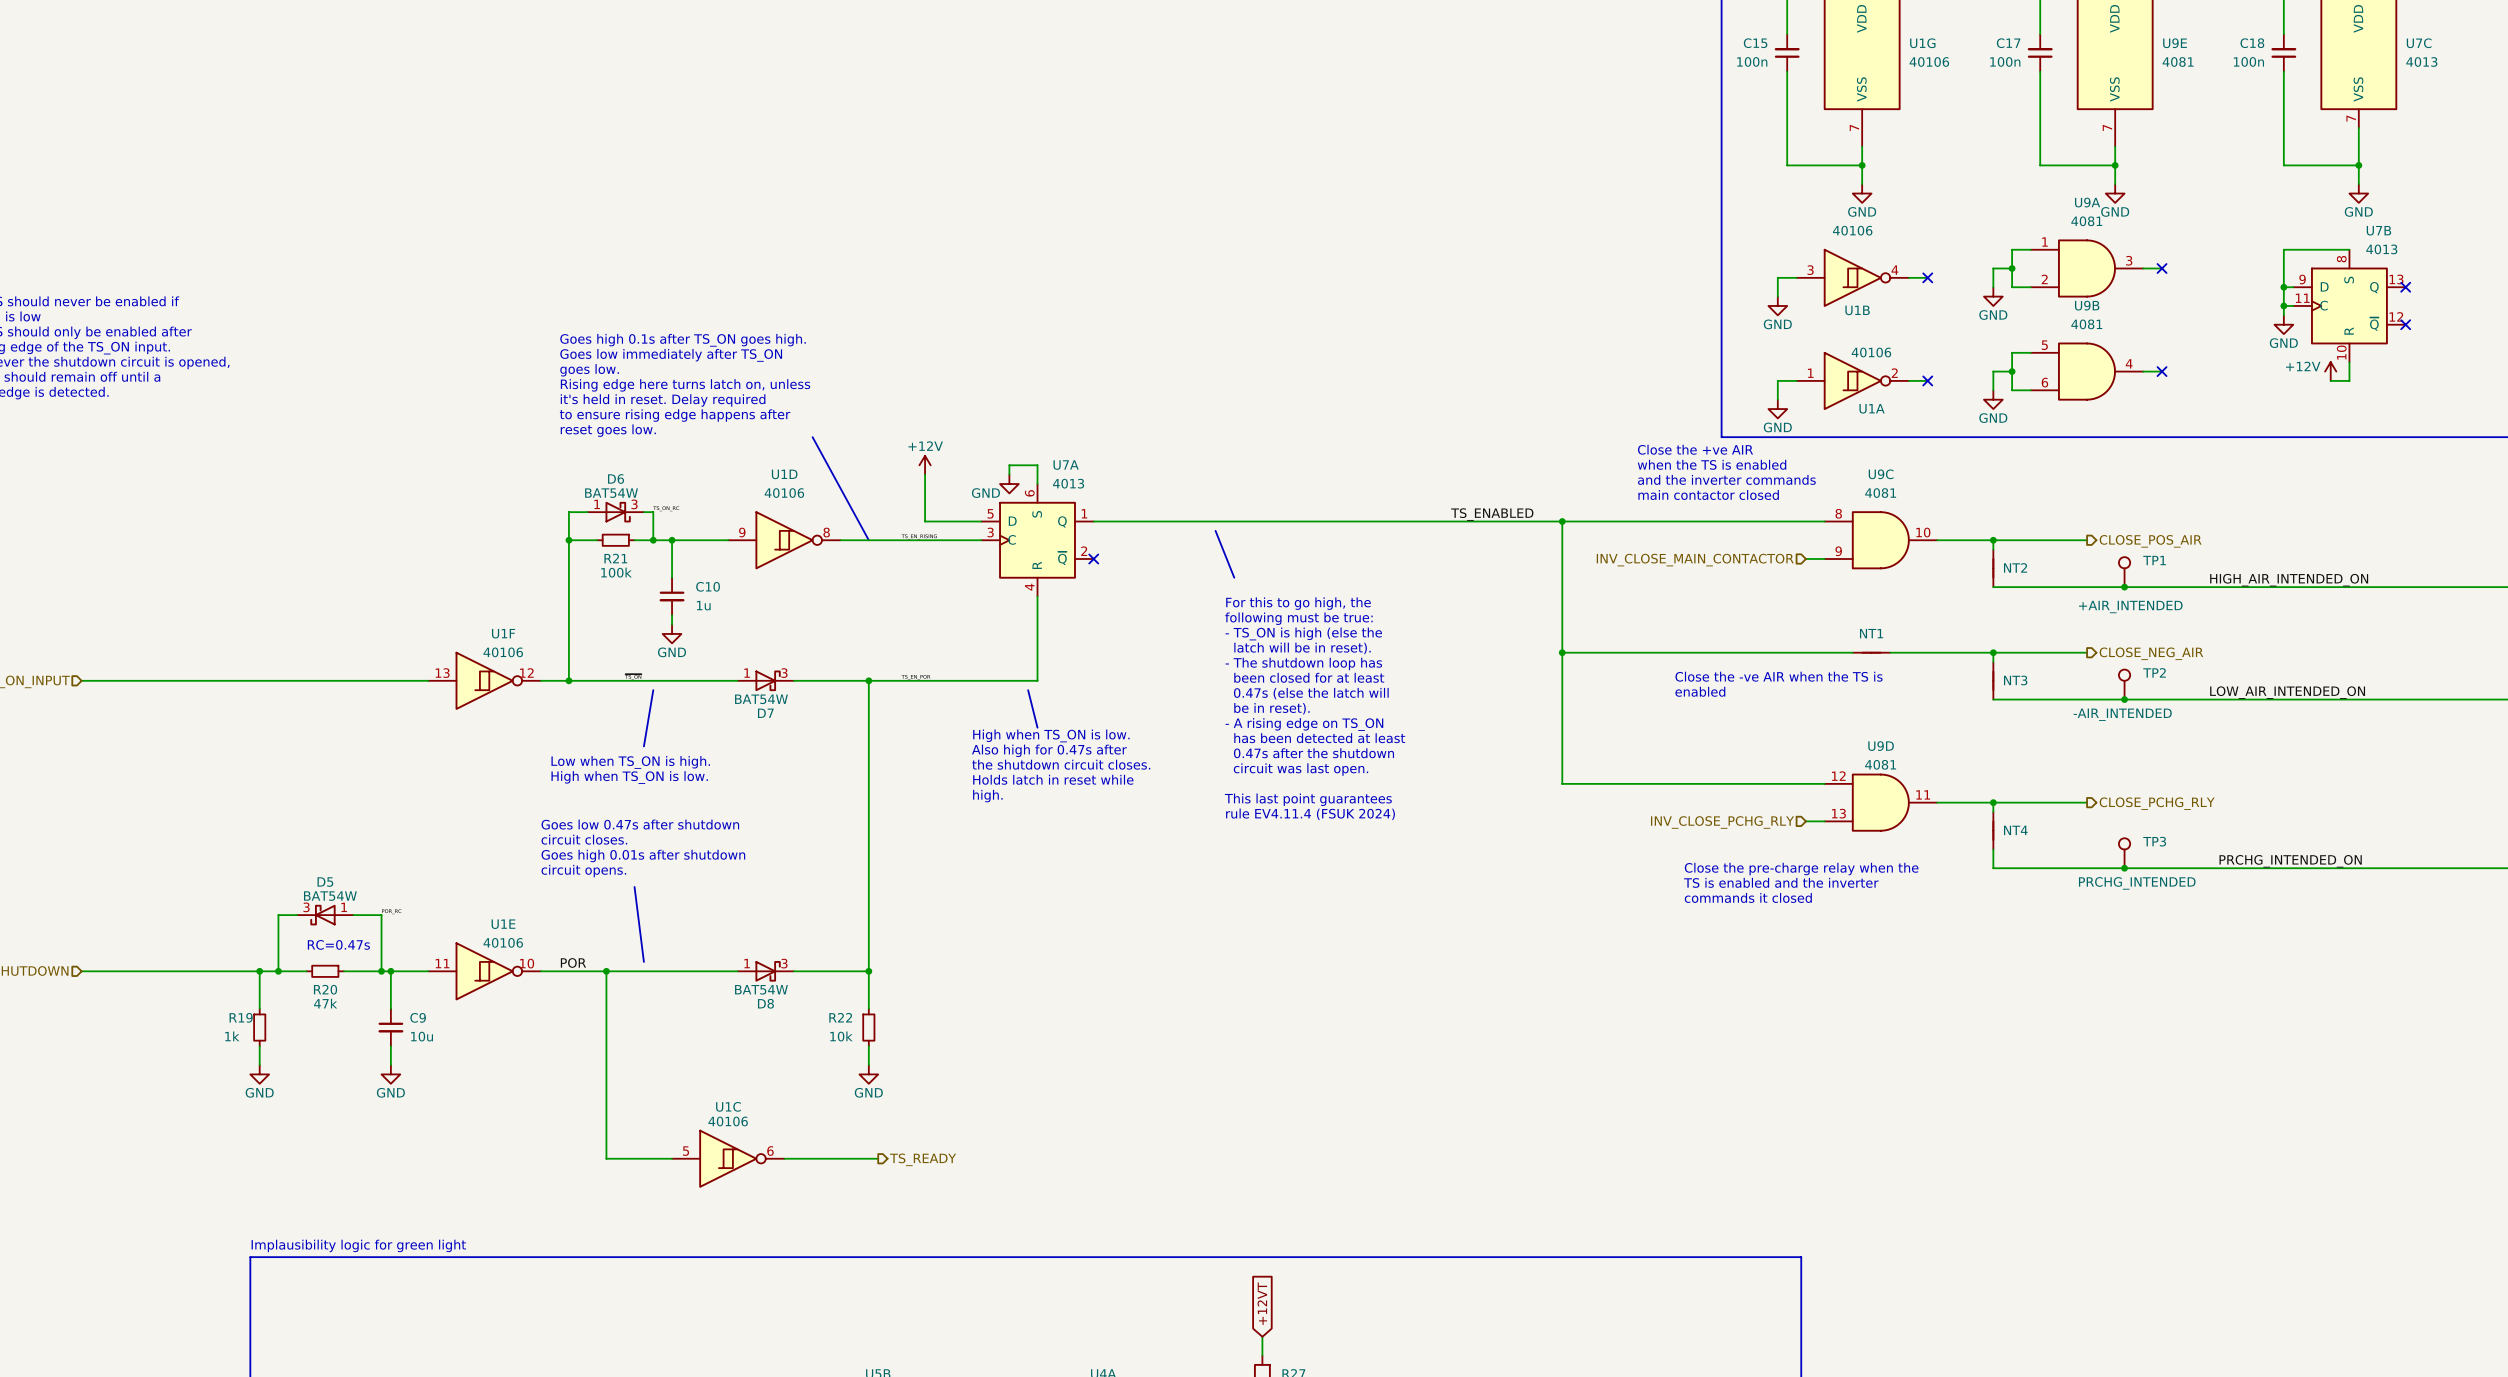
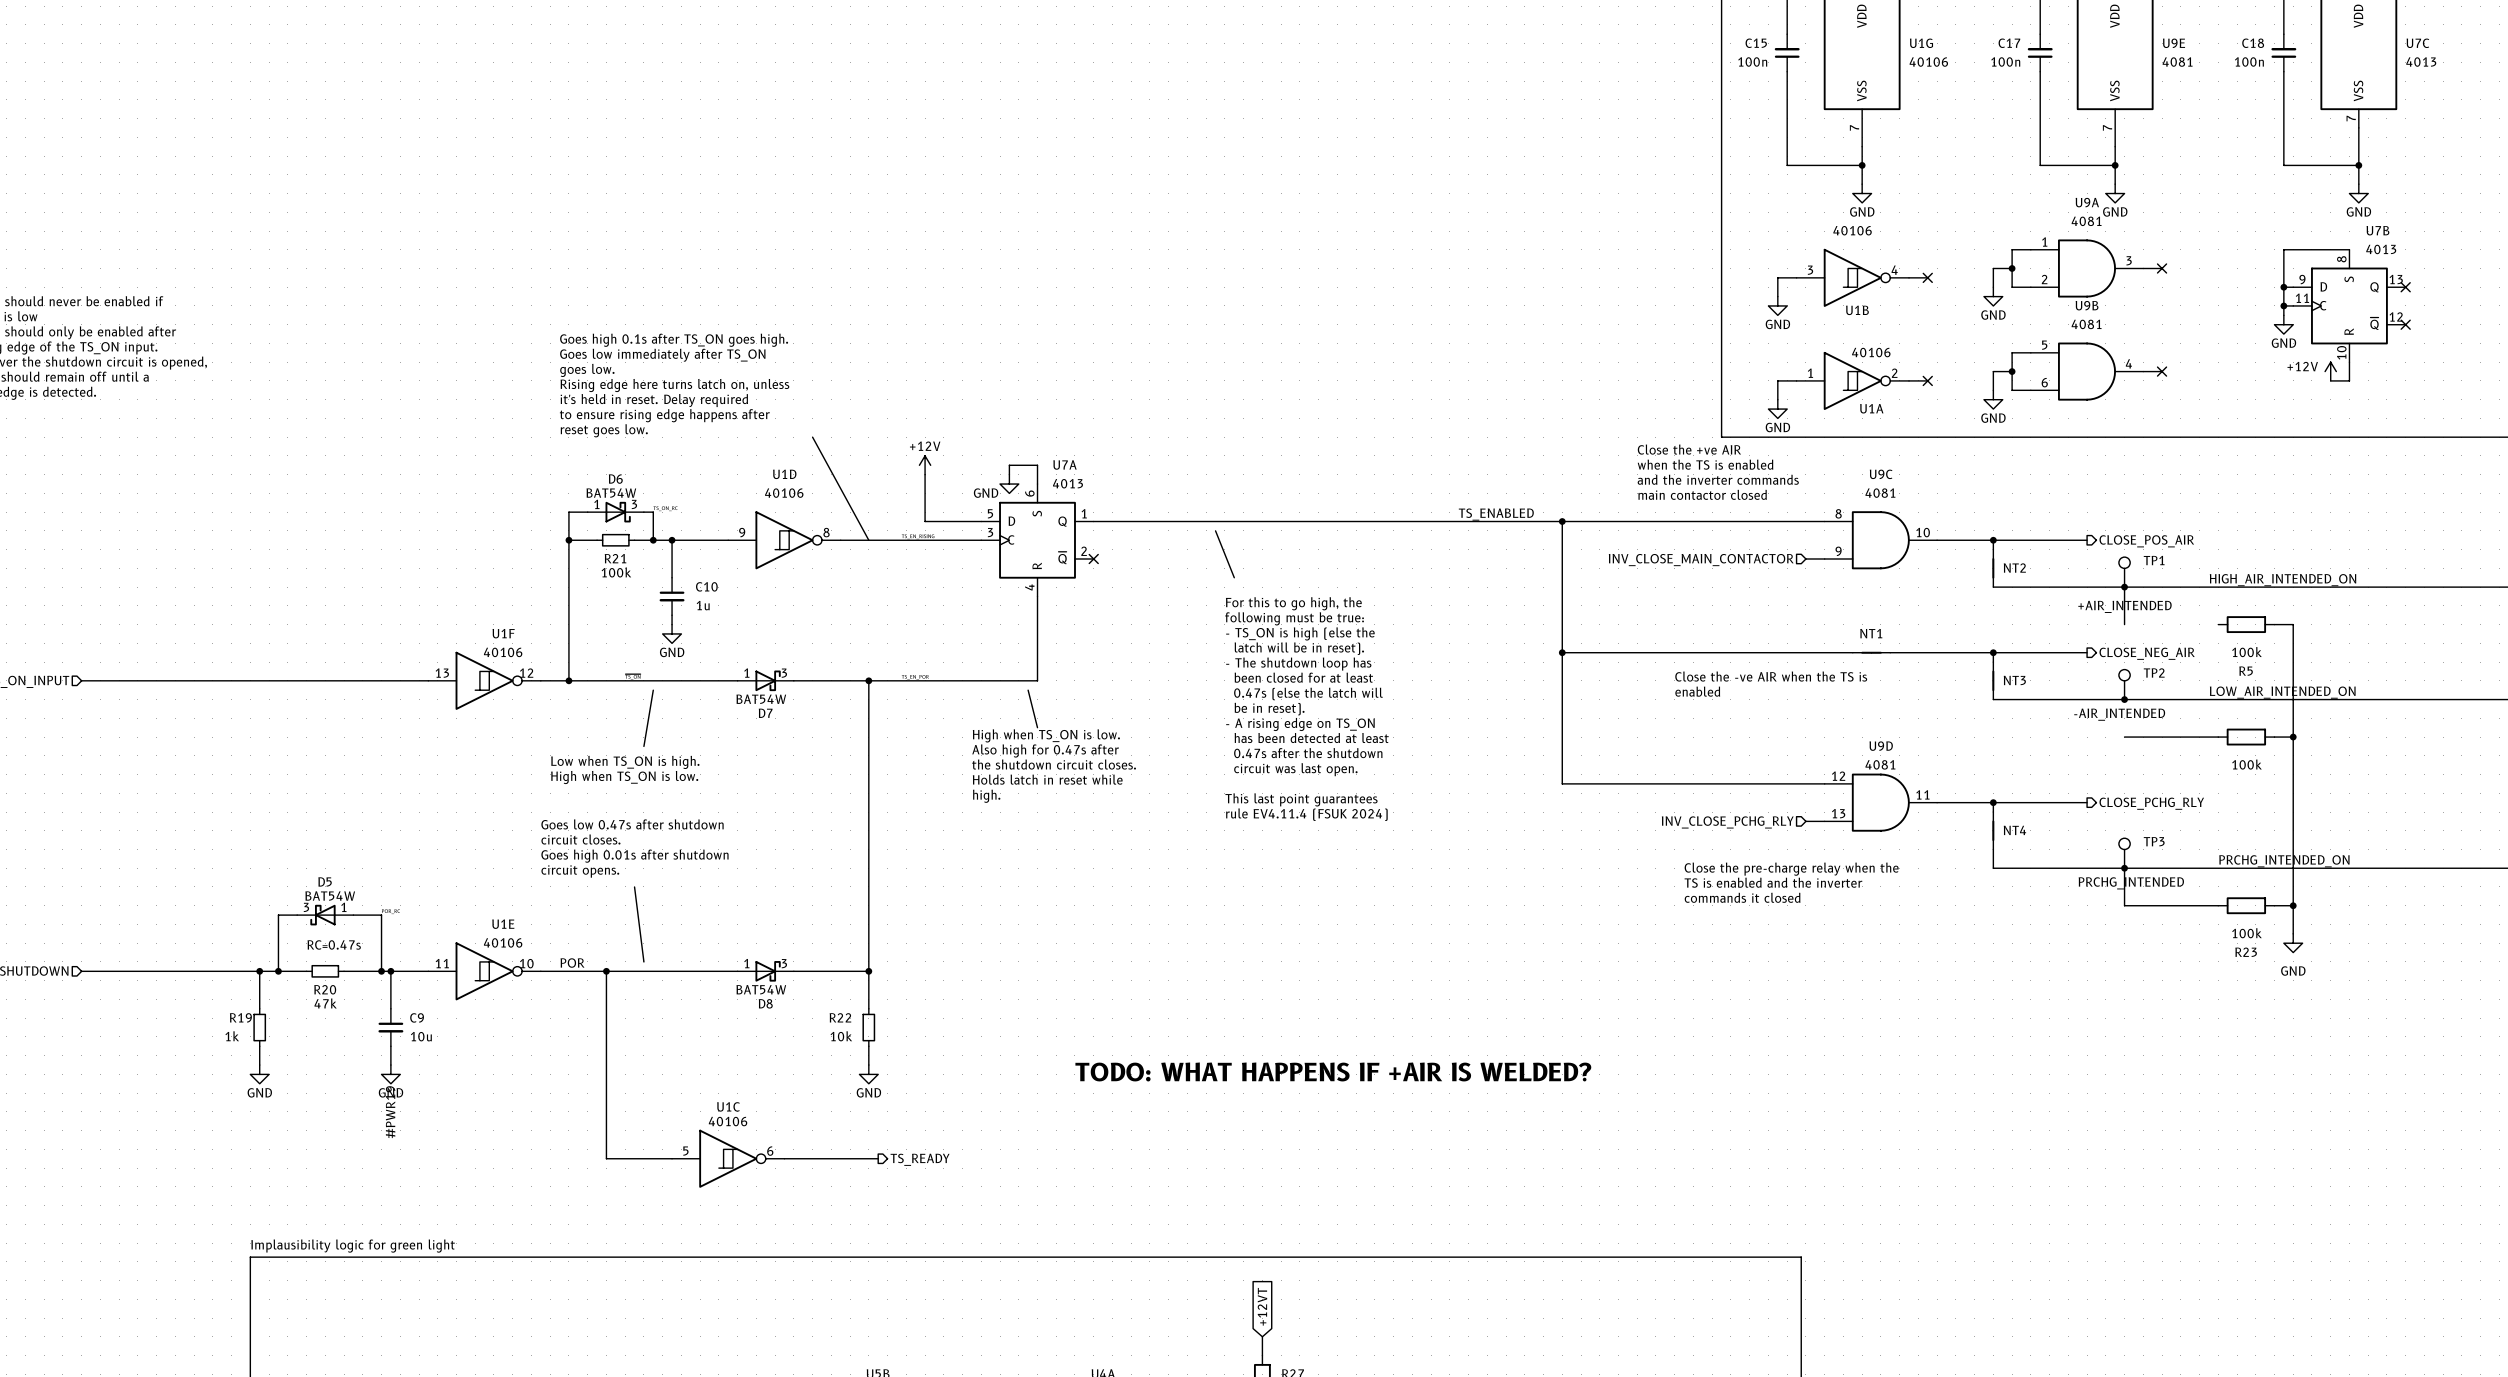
wire: none -> (2124, 587) (2124, 624)
R5: none -> 100k (2246, 624)
wire: none -> (2274, 624) (2293, 624) (2293, 933)
wire: none -> (2124, 737) (2218, 737)
#PWR19: none -> 100k (2246, 737)
wire: none -> (2274, 737) (2293, 737)
junction: none -> (2293, 737)
wire: none -> (2124, 868) (2124, 905) (2218, 905)
R23: none -> 100k (2246, 905)
wire: none -> (2274, 905) (2293, 905)
junction: none -> (2293, 905)
power symbol: none -> GND (2293, 943)
text: none -> TODO: WHAT HAPPENS IF +AIR IS WELDED? (1333, 1071)

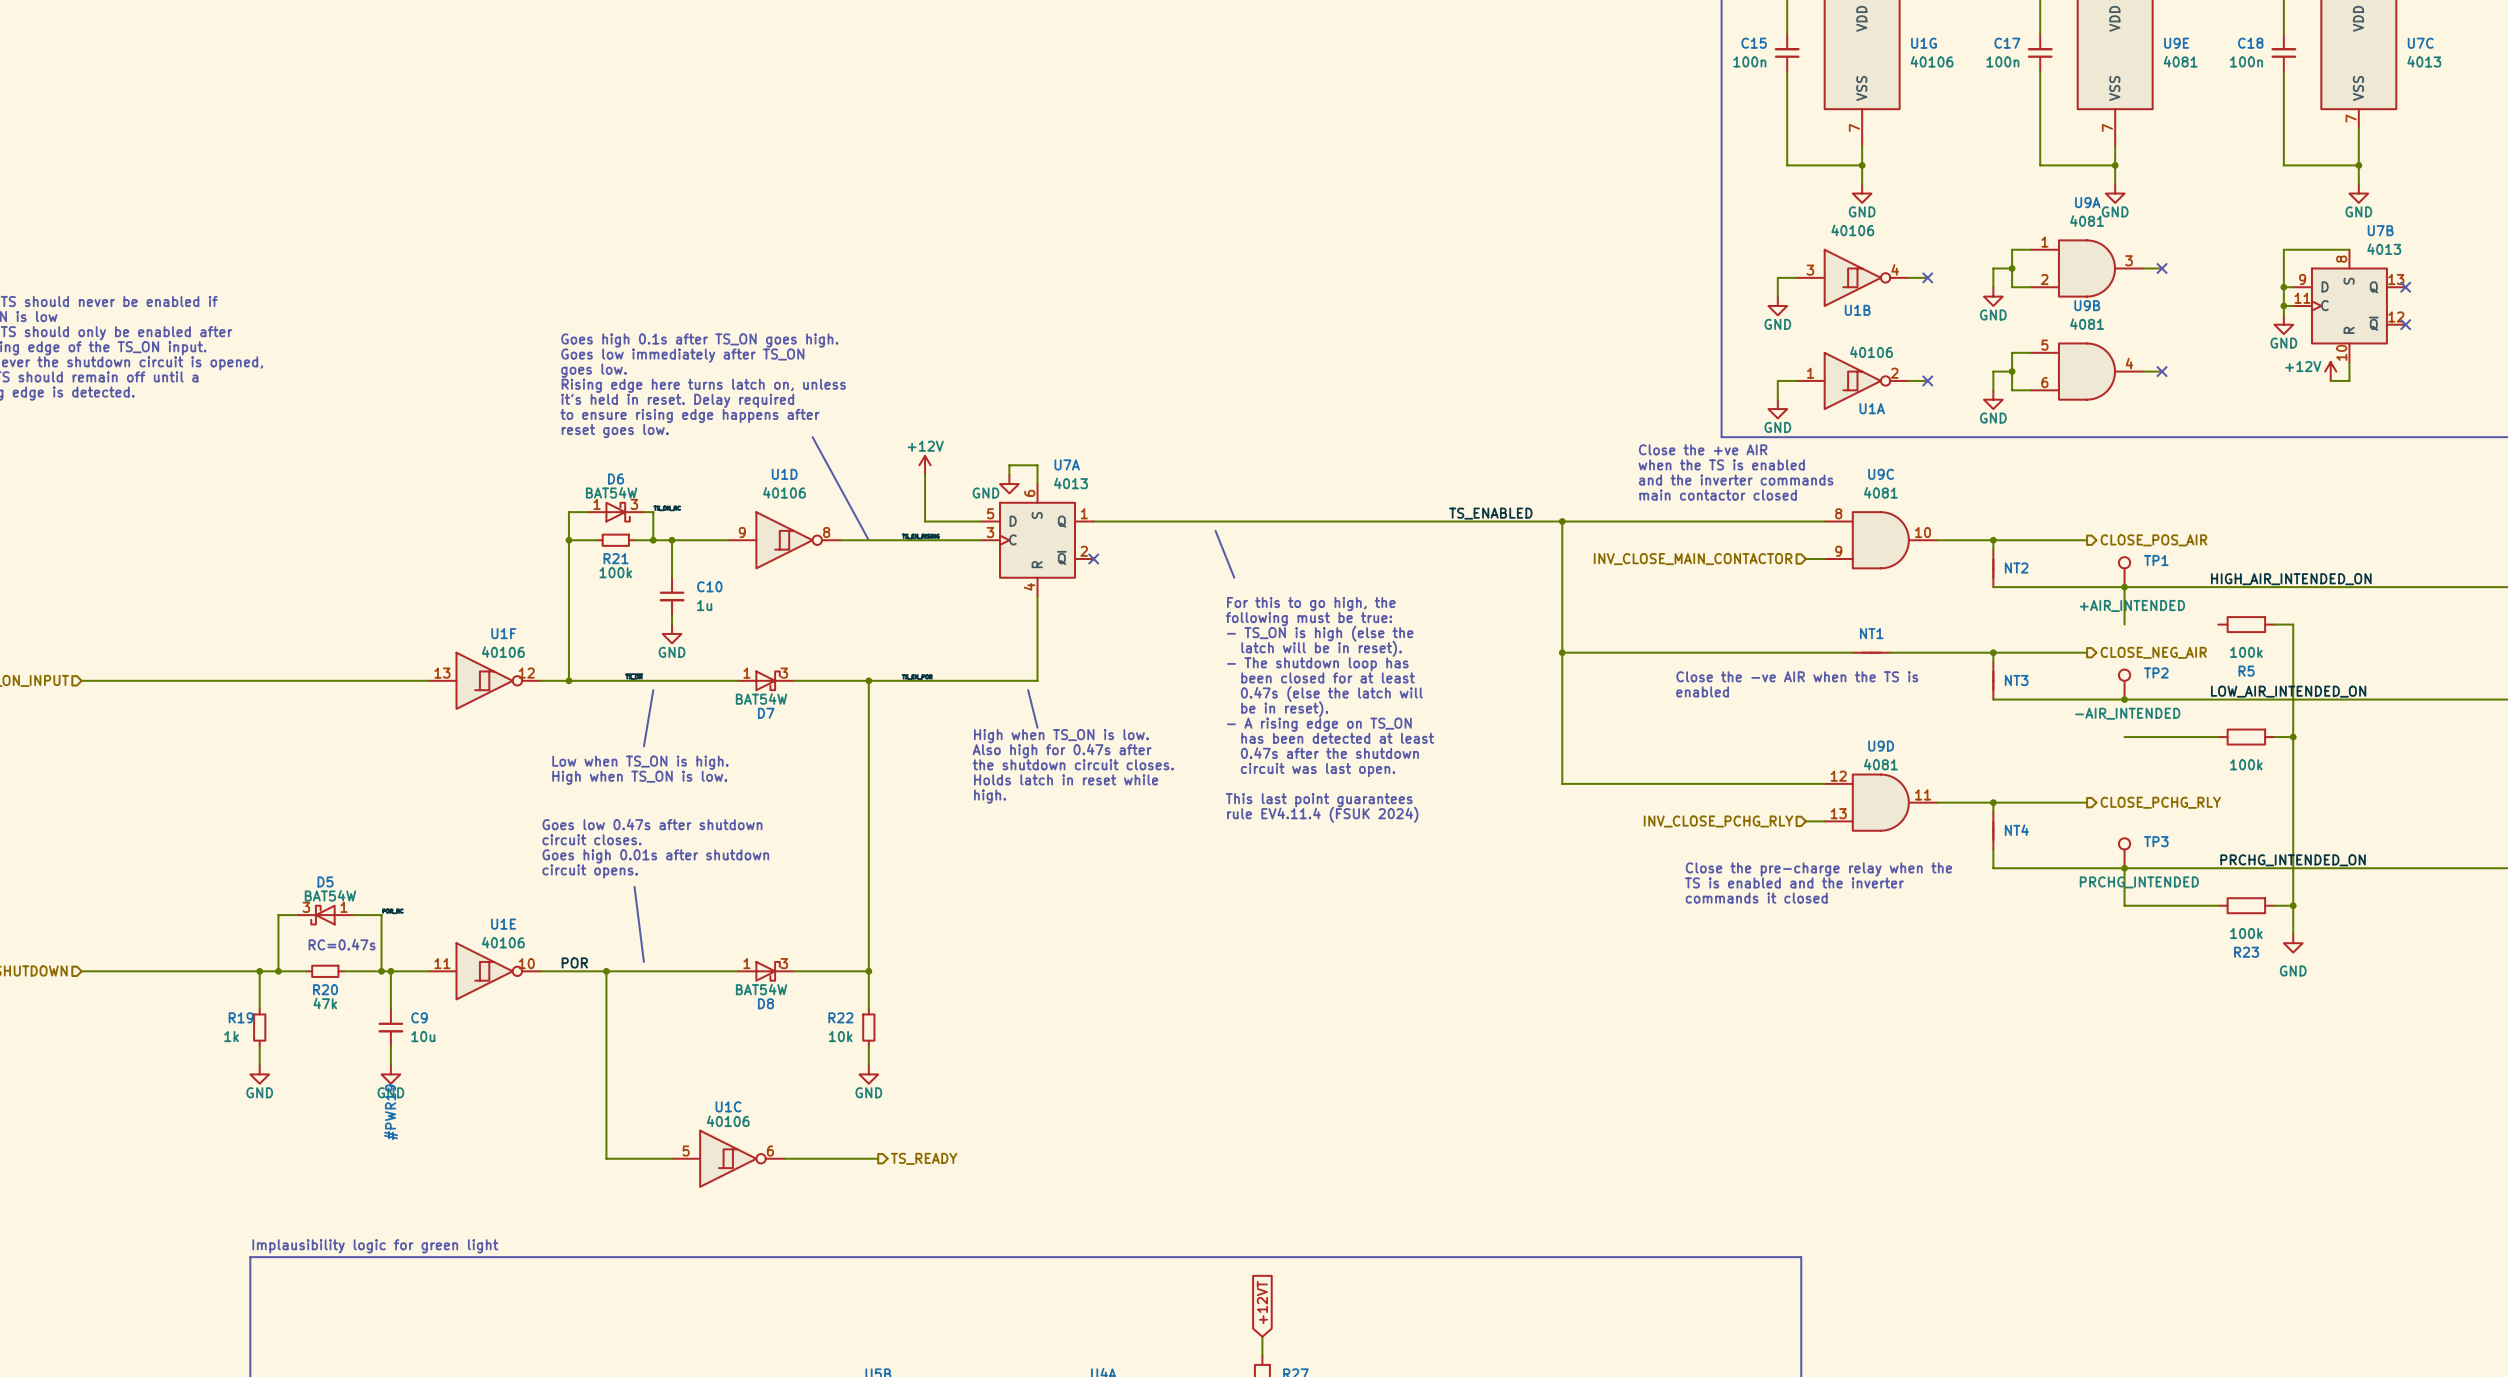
text: TODO: WHAT HAPPENS IF +AIR IS WELDED? (1333, 1071) -> none

